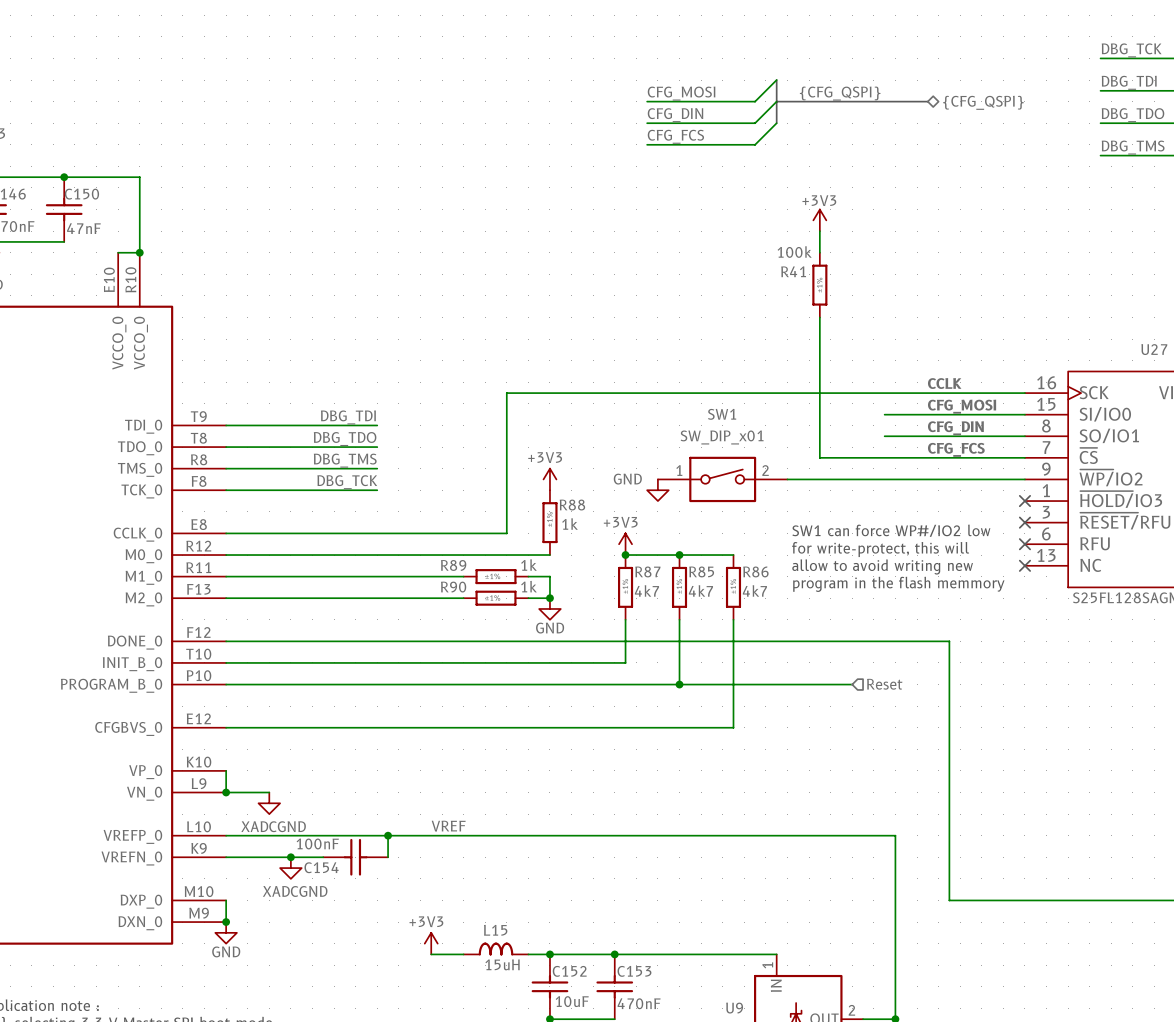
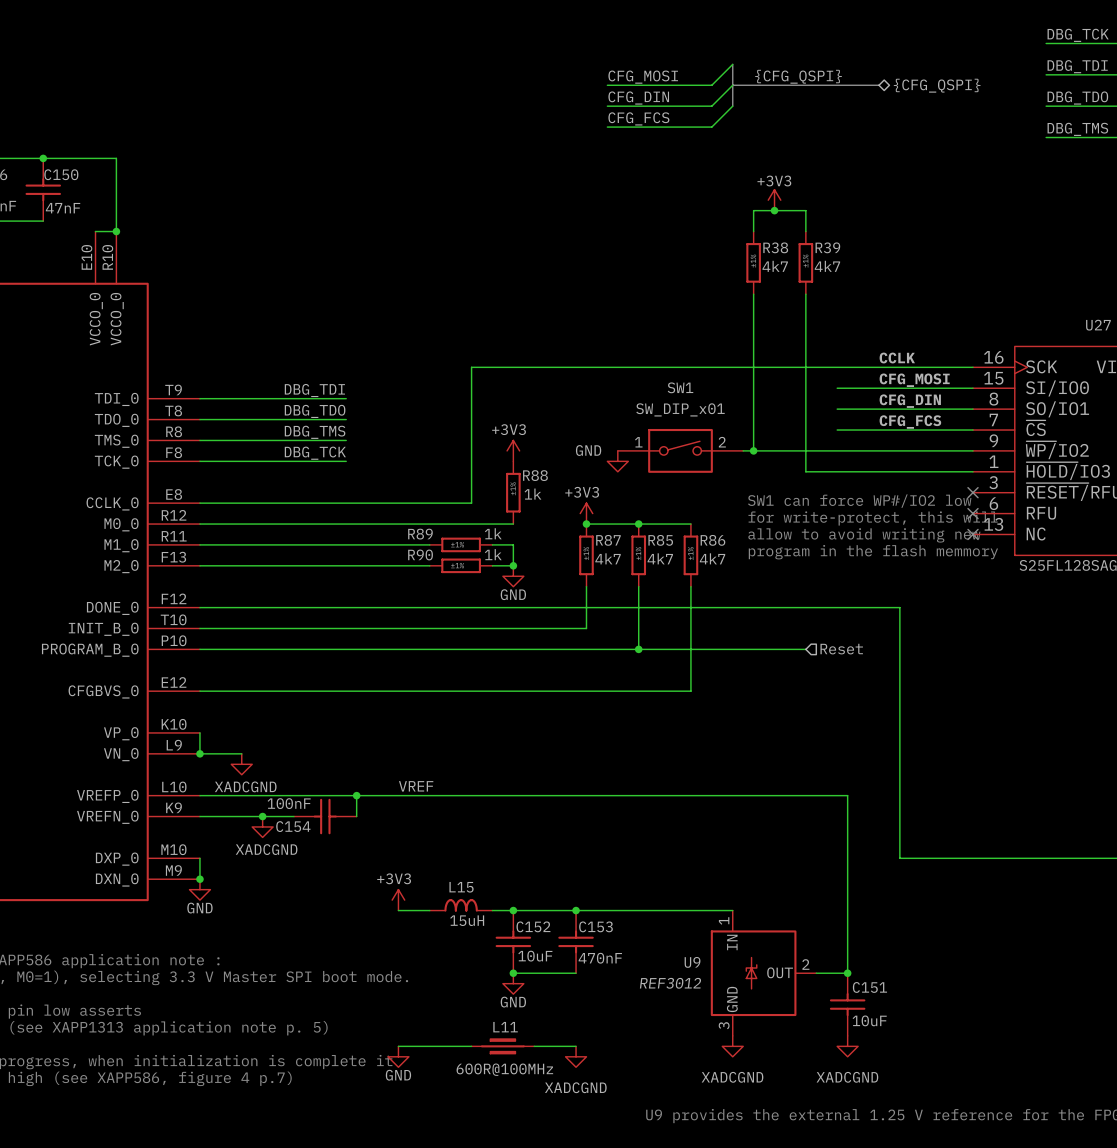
wire: (819, 231) (819, 252) -> none
junction: none -> (774, 210)
wire: none -> (753, 231) (753, 210) (805, 210) (805, 231)
R38: none -> (753, 262)
R41: (819, 285) -> none
R39: none -> (805, 262)
wire: none -> (753, 294) (753, 450)
wire: (819, 317) (819, 457) (884, 457) -> none
wire: none -> (805, 294) (805, 471) (973, 471)
junction: none -> (753, 450)
no-connect mark: (1024, 501) -> none

